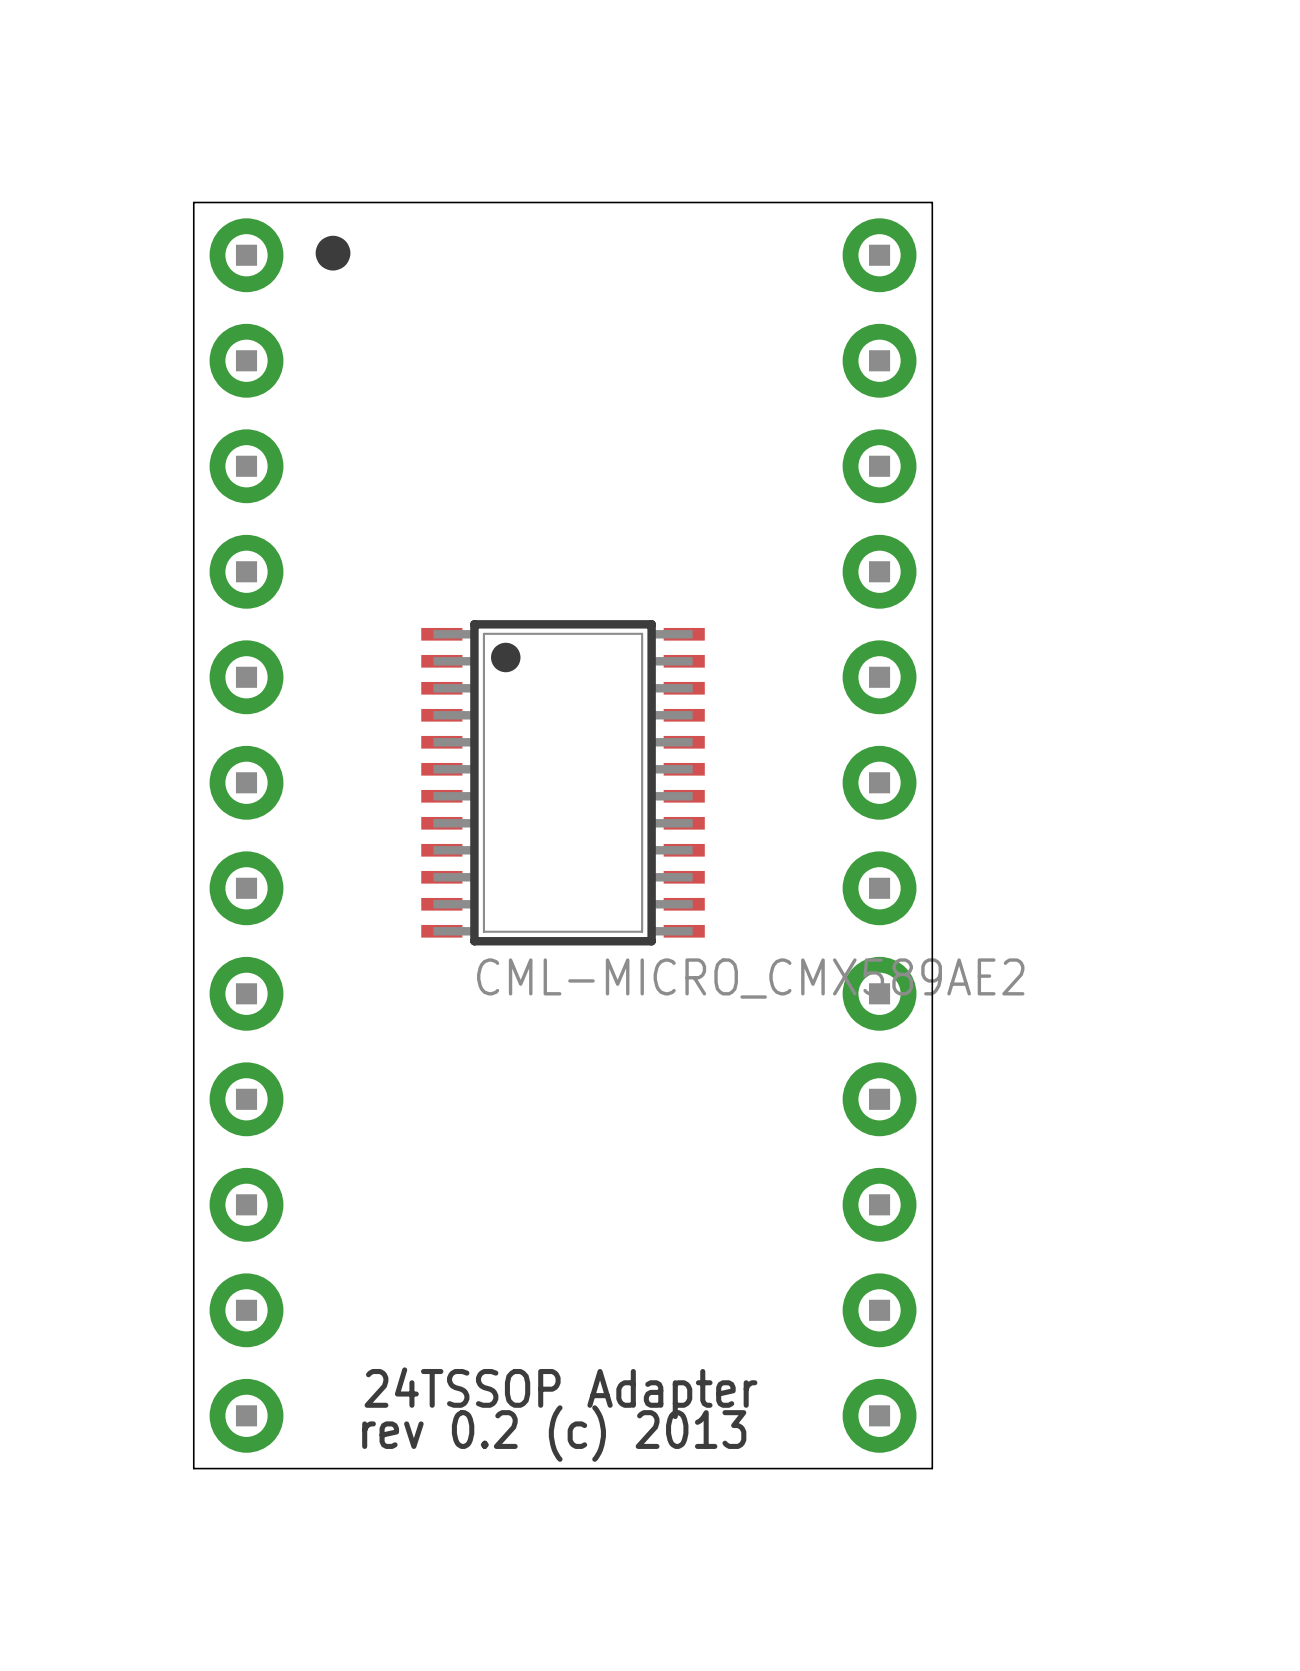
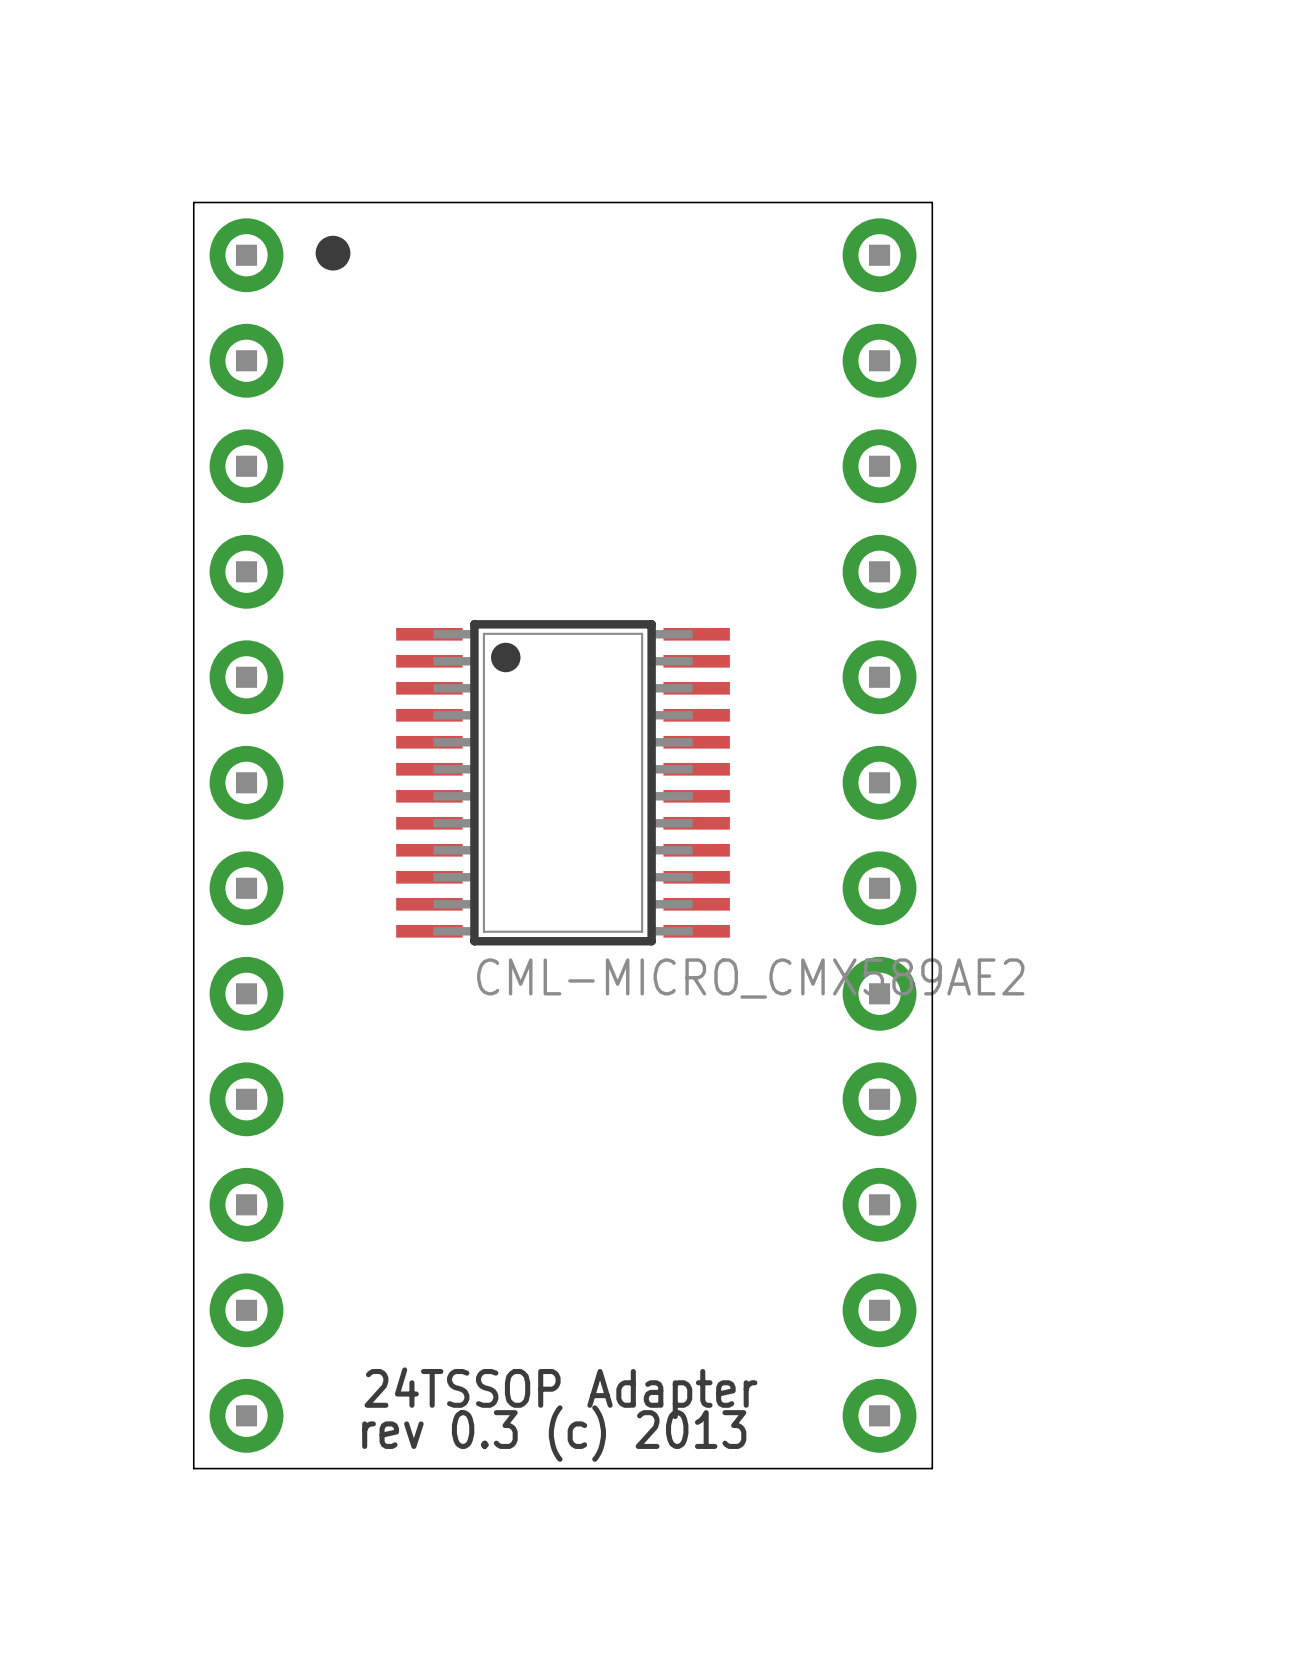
part footprint: [421, 620, 705, 946] -> [396, 620, 730, 946]
text: rev 0.2 (c) 2013 (554, 1433) -> rev 0.3 (c) 2013 (554, 1433)

